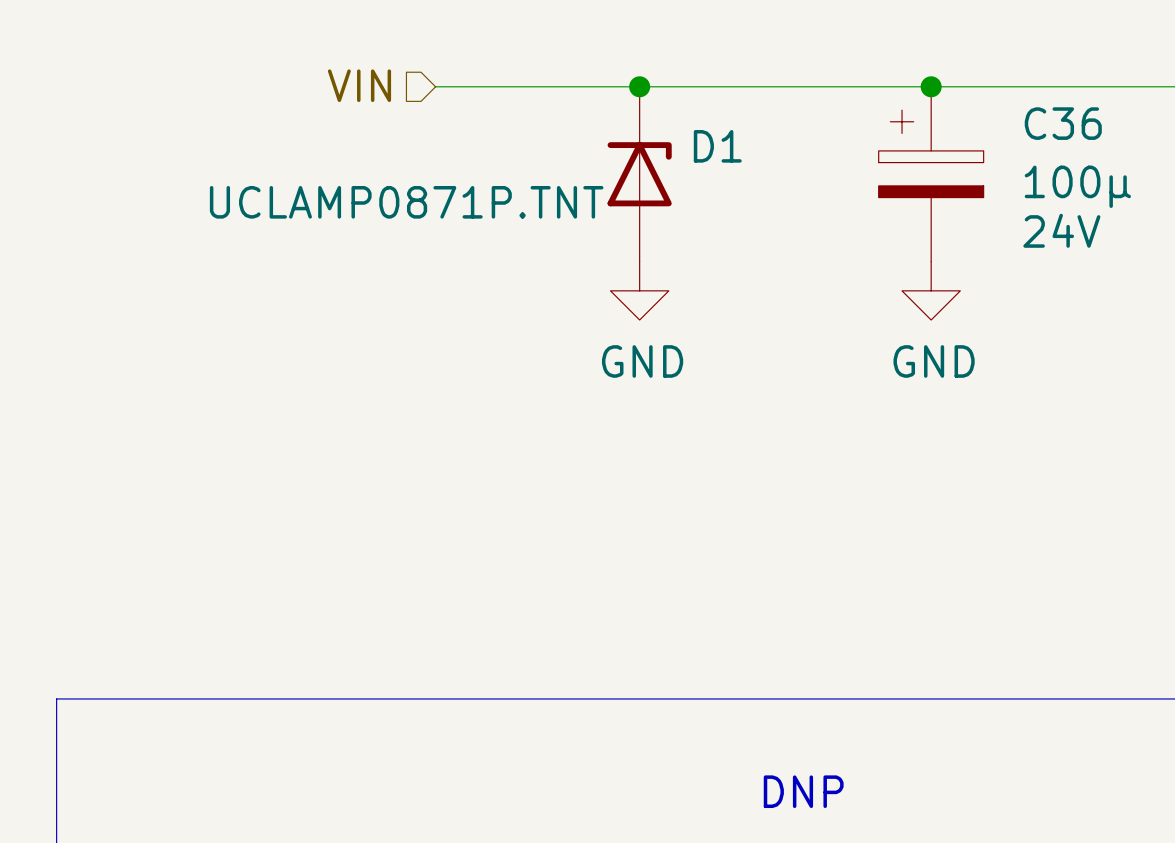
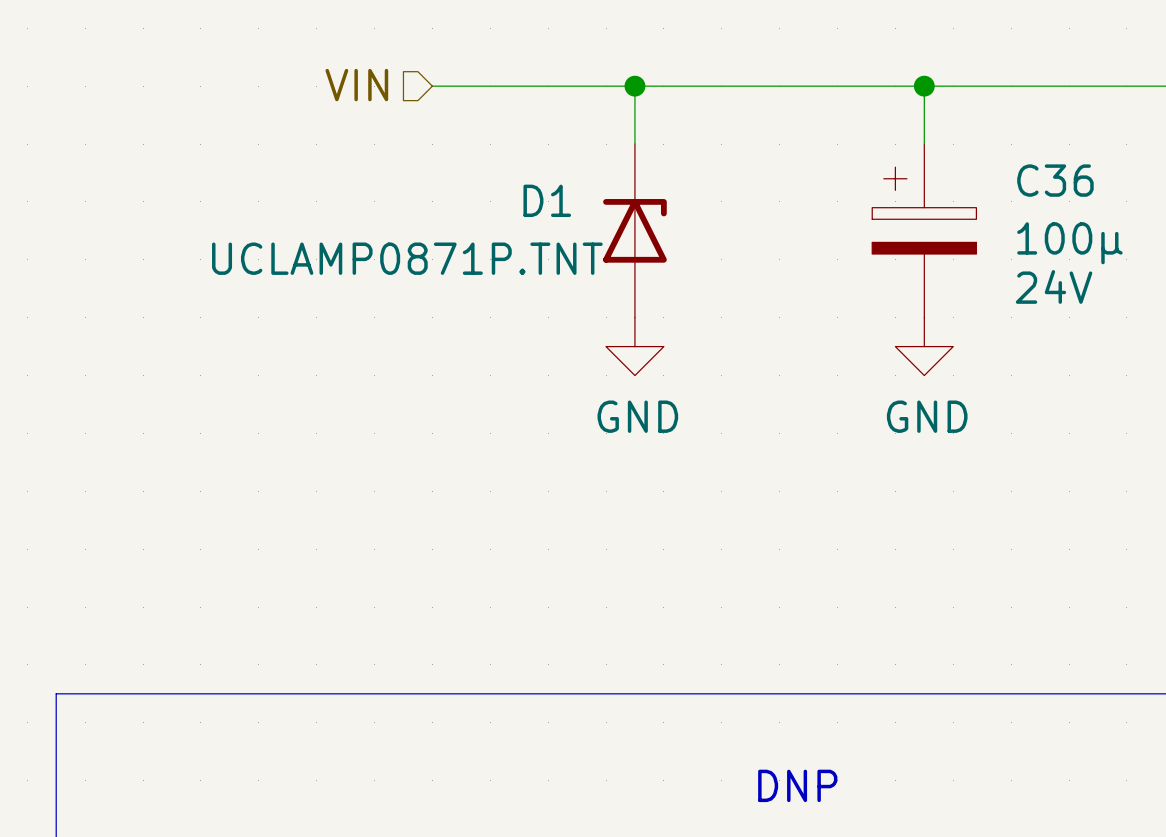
D1 name position: D1 (717, 146) -> D1 (547, 200)
D1 position: (639, 174) -> (634, 230)
C36 position: (931, 174) -> (924, 230)
D1 value position: UCLAMP0871P.TNT (406, 202) -> UCLAMP0871P.TNT (407, 258)
power symbol position: GND (639, 290) -> GND (634, 346)
power symbol position: GND (931, 290) -> GND (924, 346)

